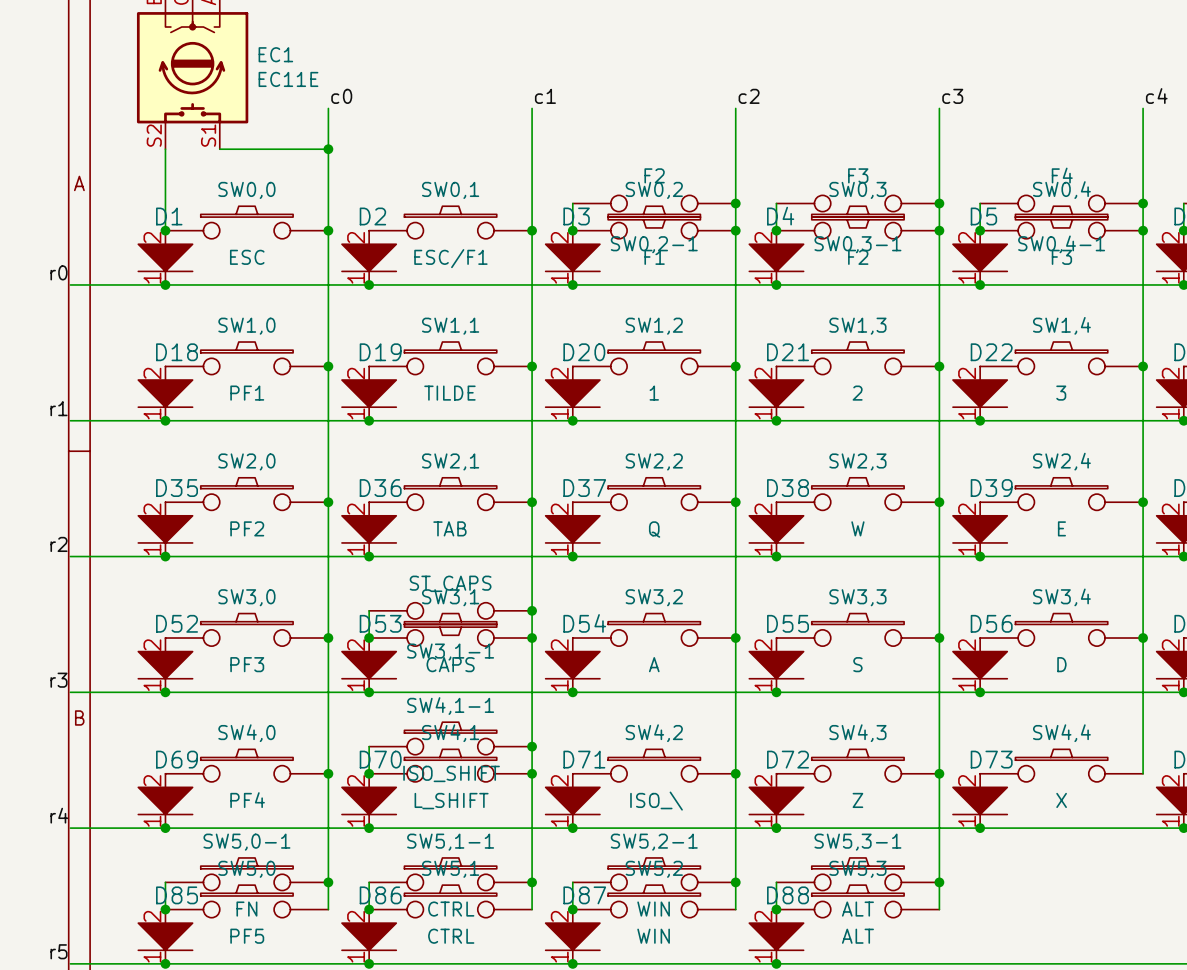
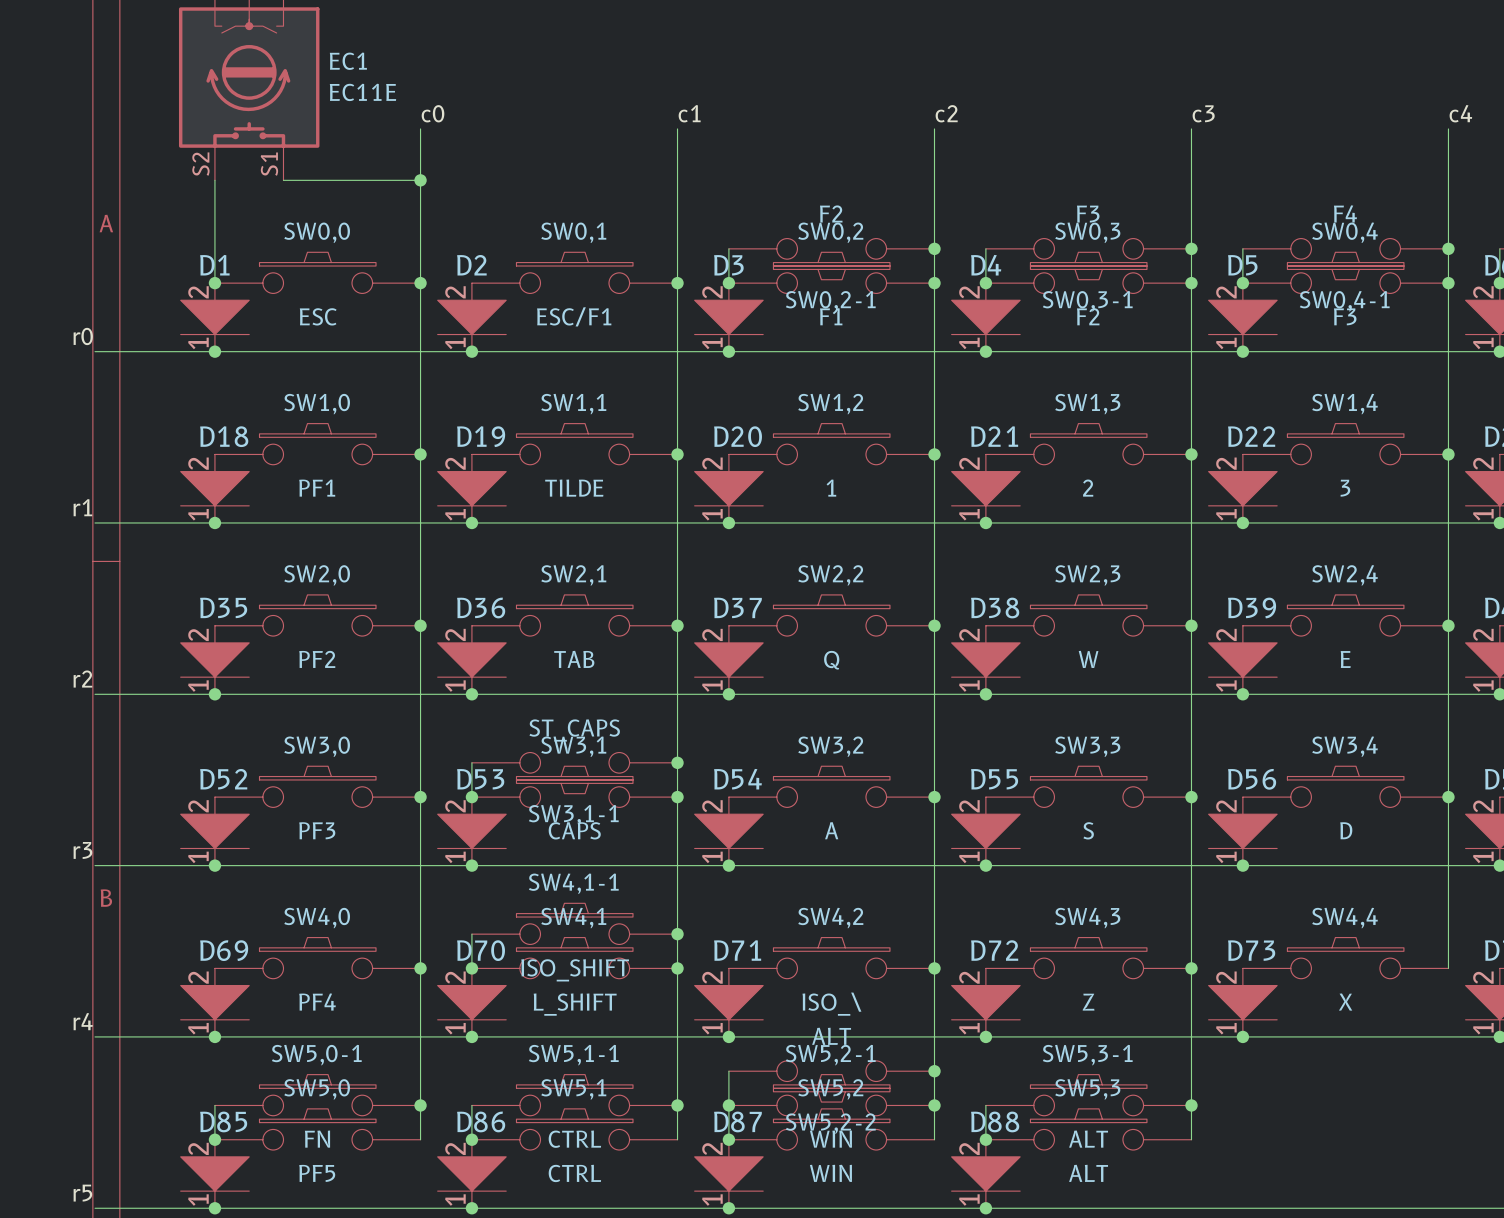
wire: none -> (728, 1071) (728, 1105)
junction: none -> (934, 1071)
SW5,2-2: none -> ALT (831, 1081)
junction: none -> (728, 1105)

